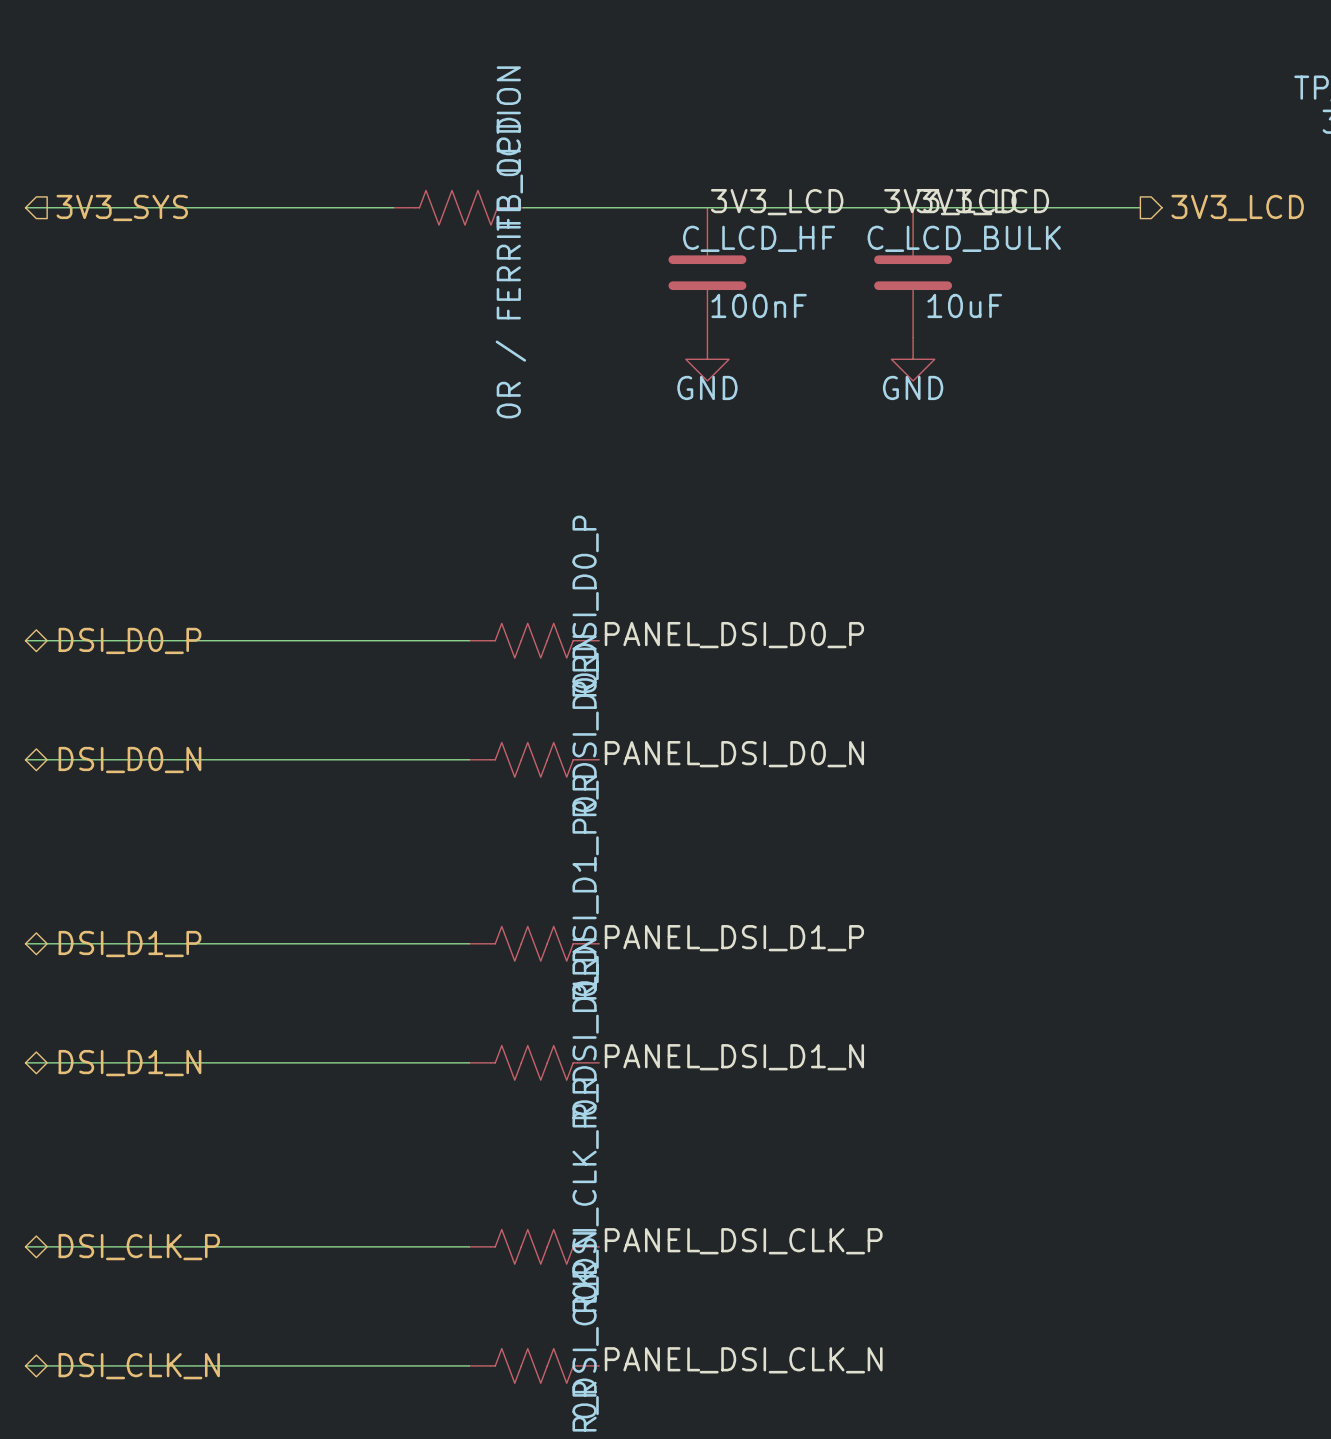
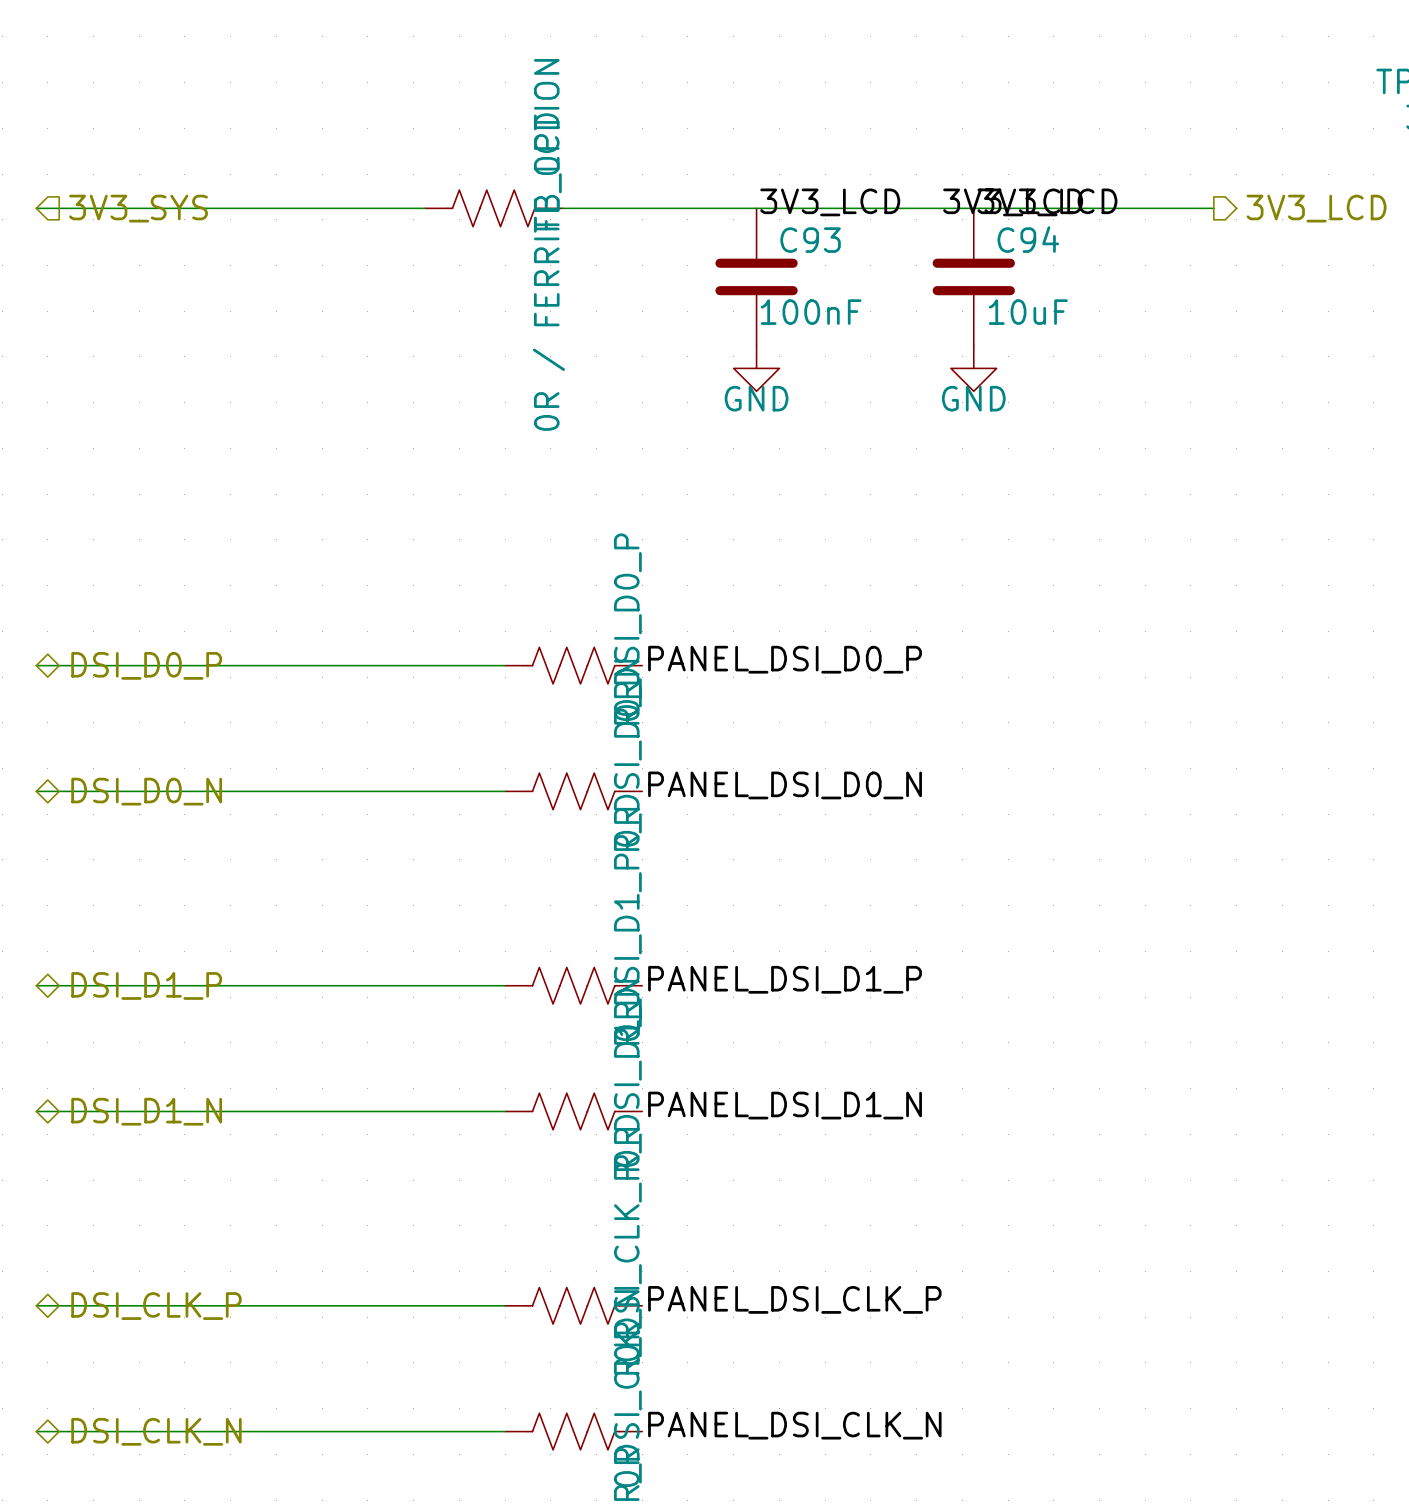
C_LCD_HF name: C_LCD_HF (759, 238) -> C93 (810, 240)
C_LCD_BULK name: C_LCD_BULK (964, 238) -> C94 (1028, 239)

